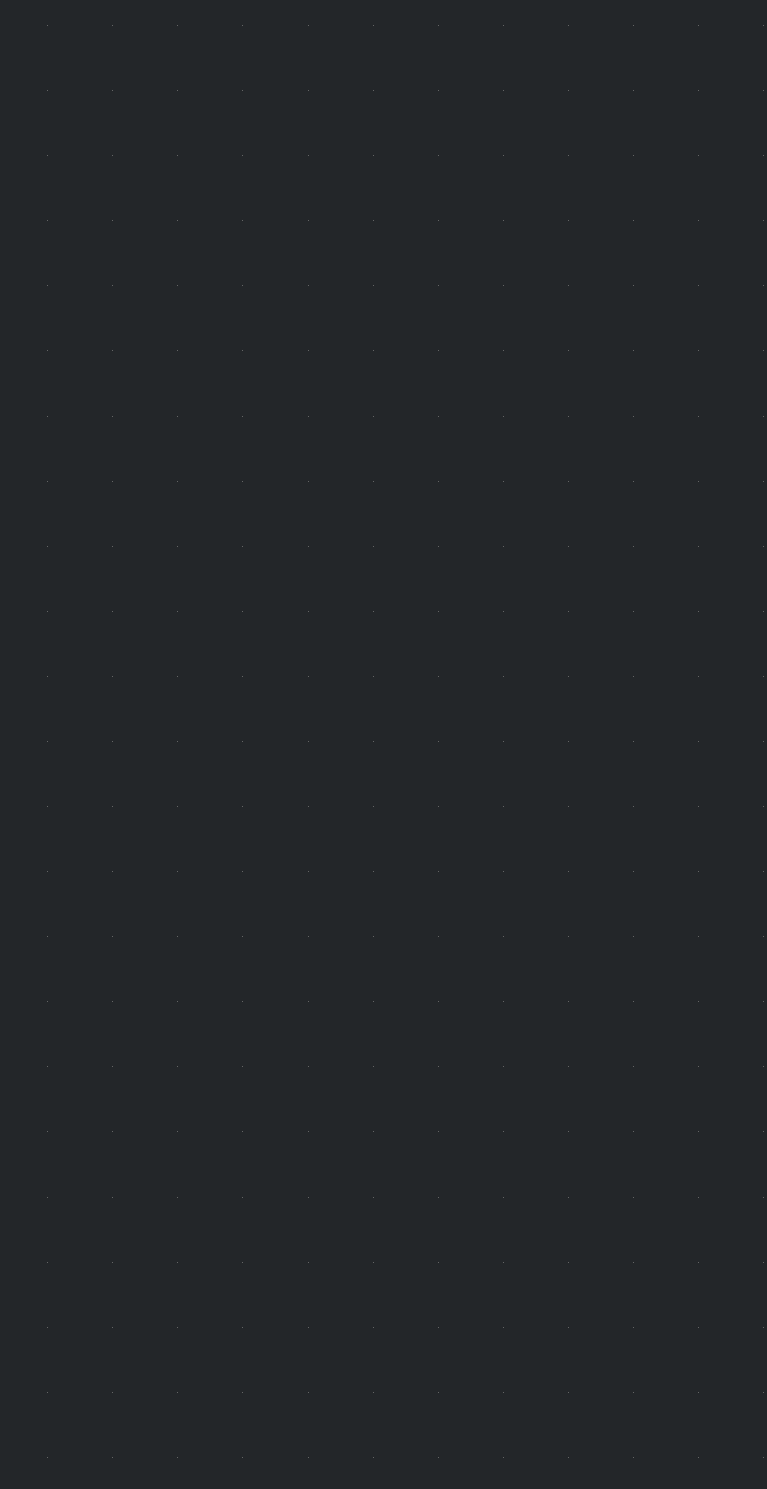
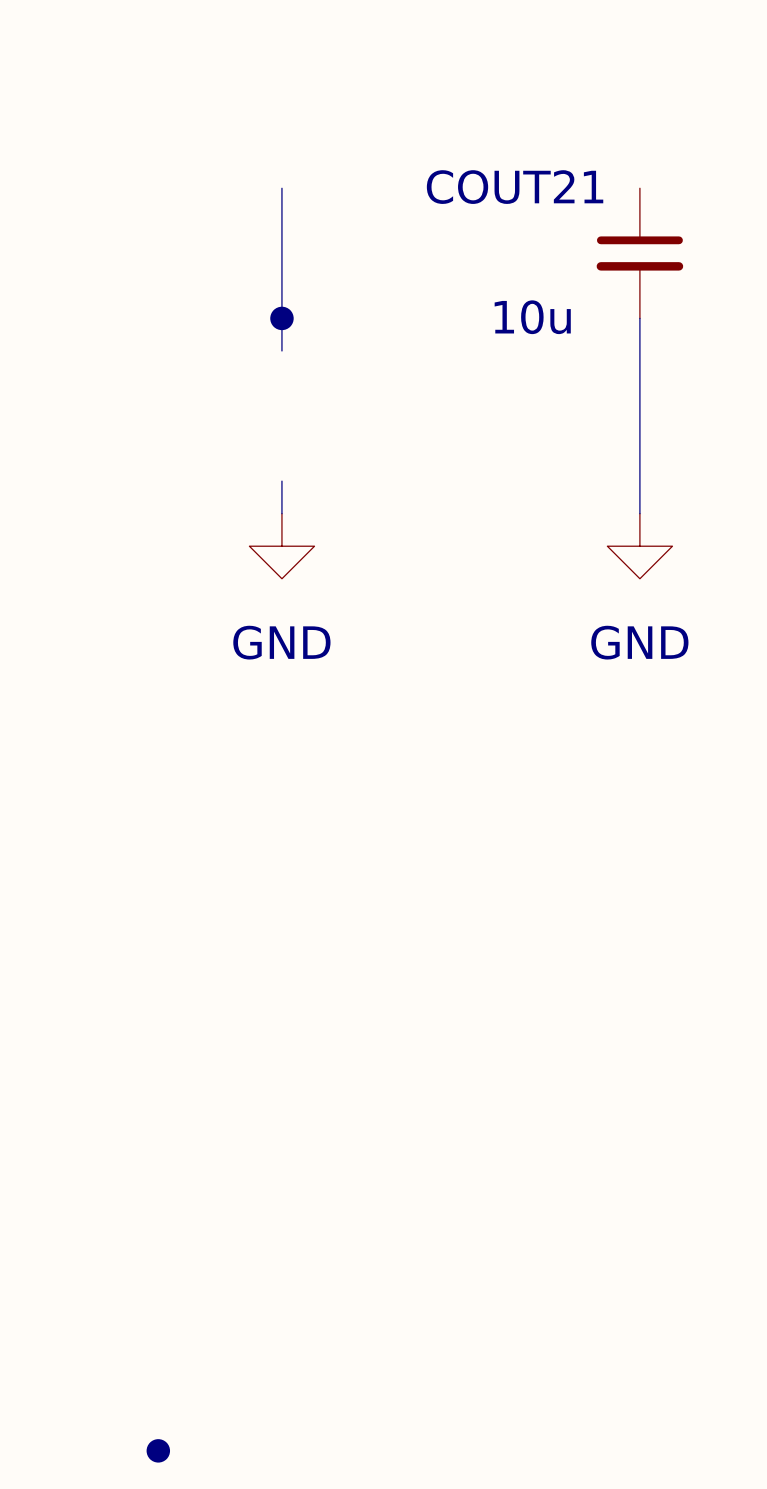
wire: none -> (281, 188) (281, 350)
COUT21: none -> 10u (639, 253)
junction: none -> (281, 318)
wire: none -> (639, 318) (639, 513)
wire: none -> (281, 481) (281, 513)
power symbol: none -> GND (281, 546)
power symbol: none -> GND (639, 546)
junction: none -> (158, 1450)

